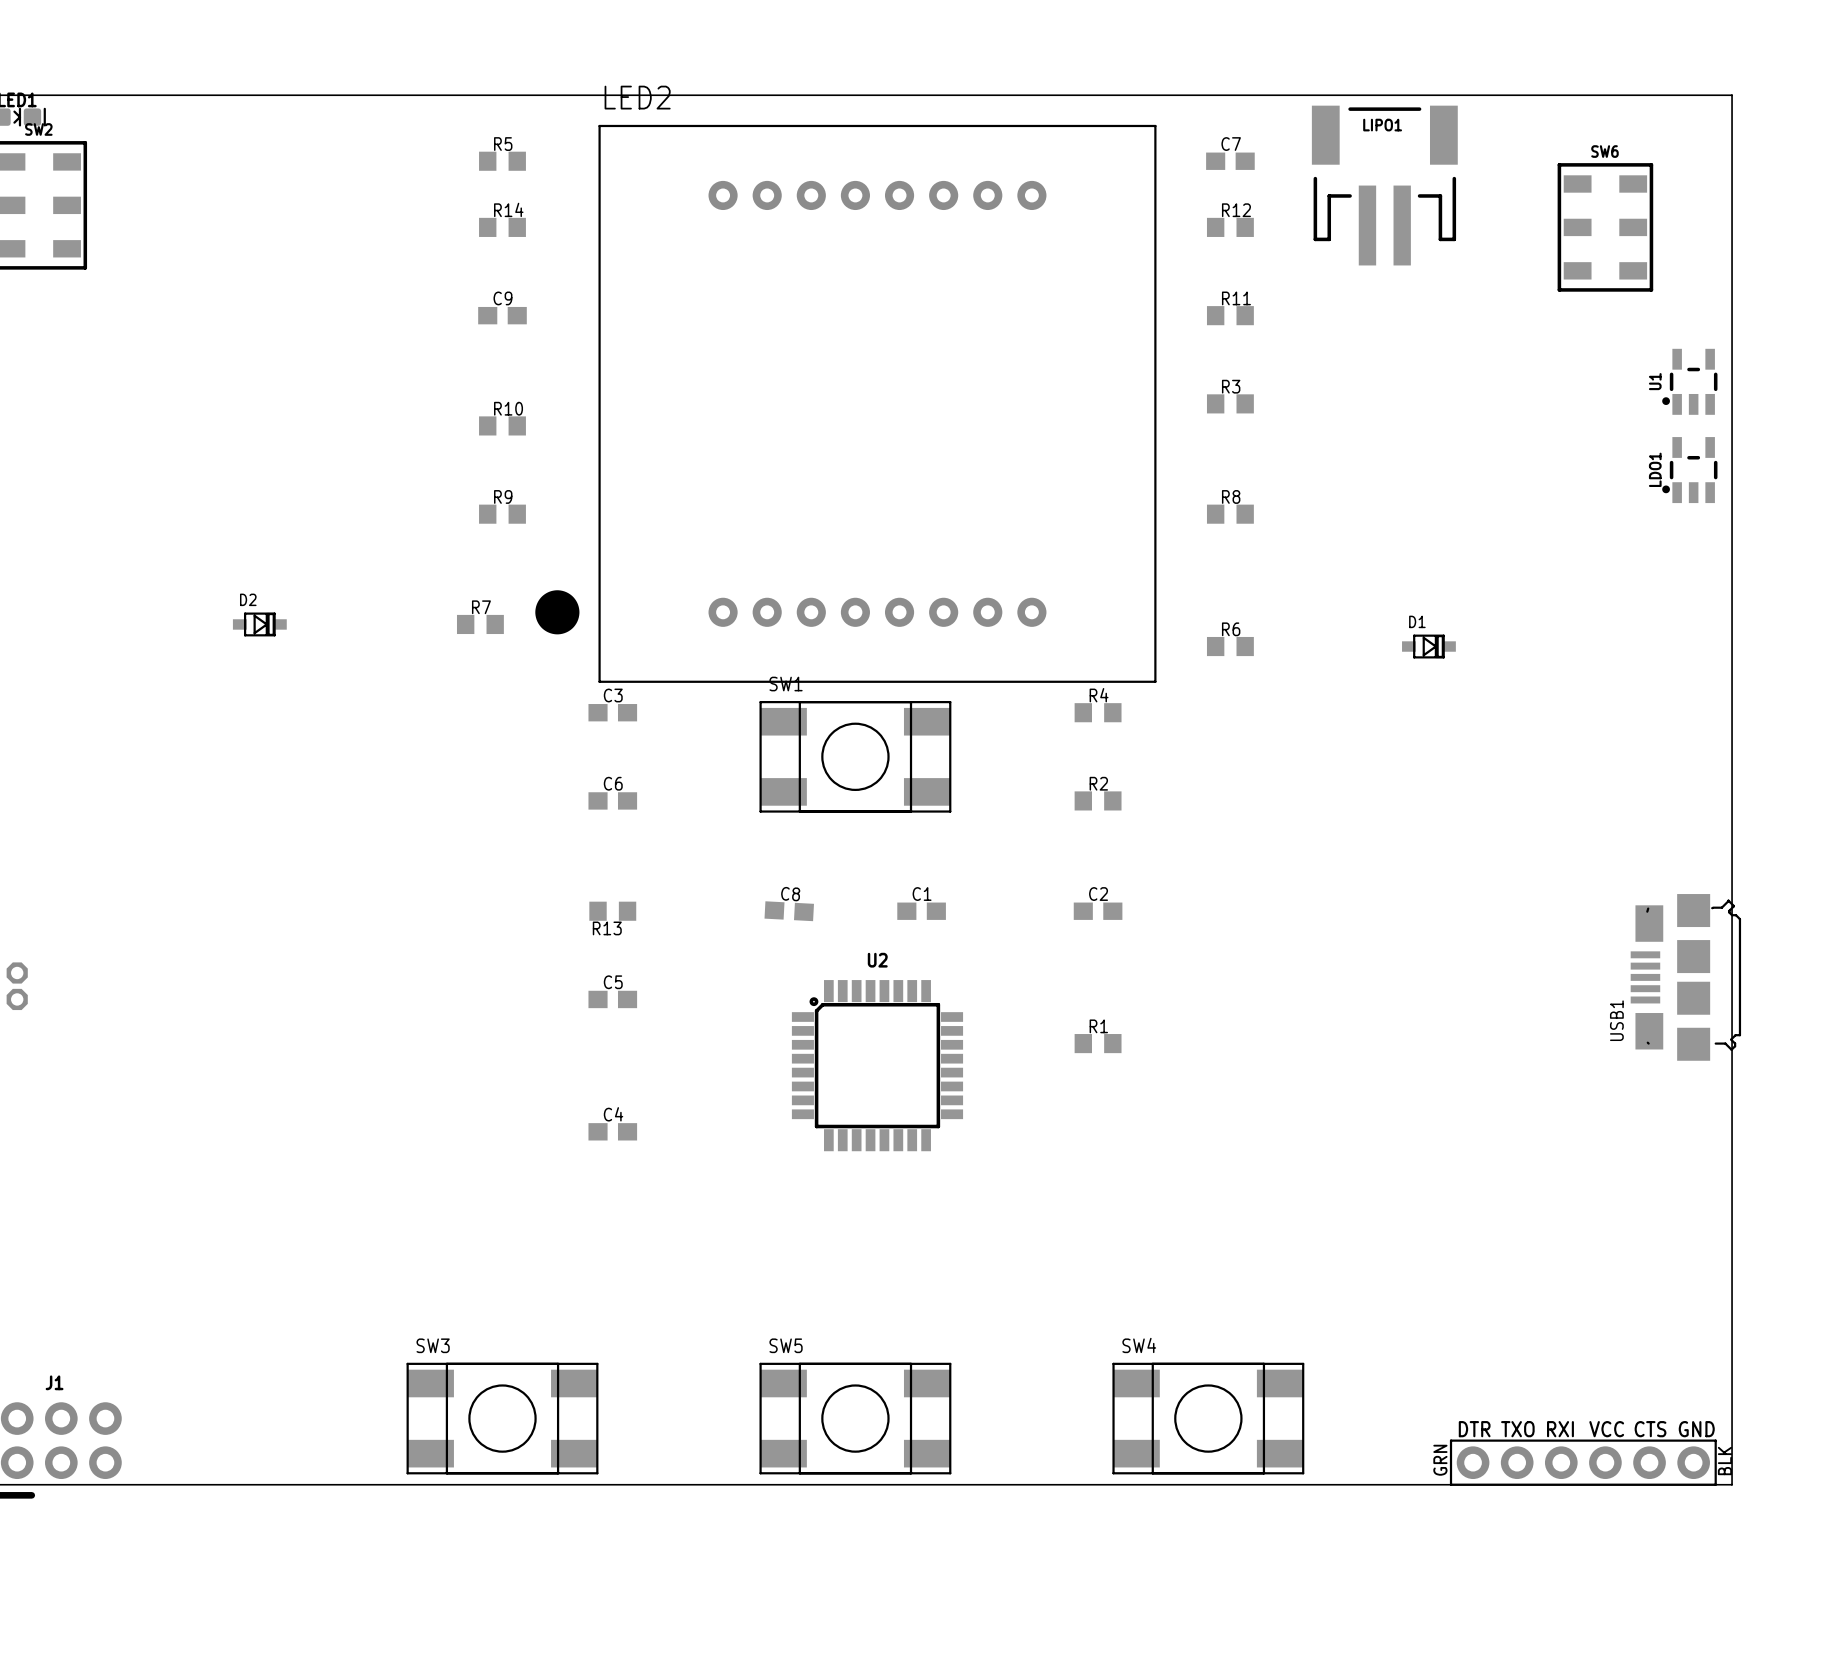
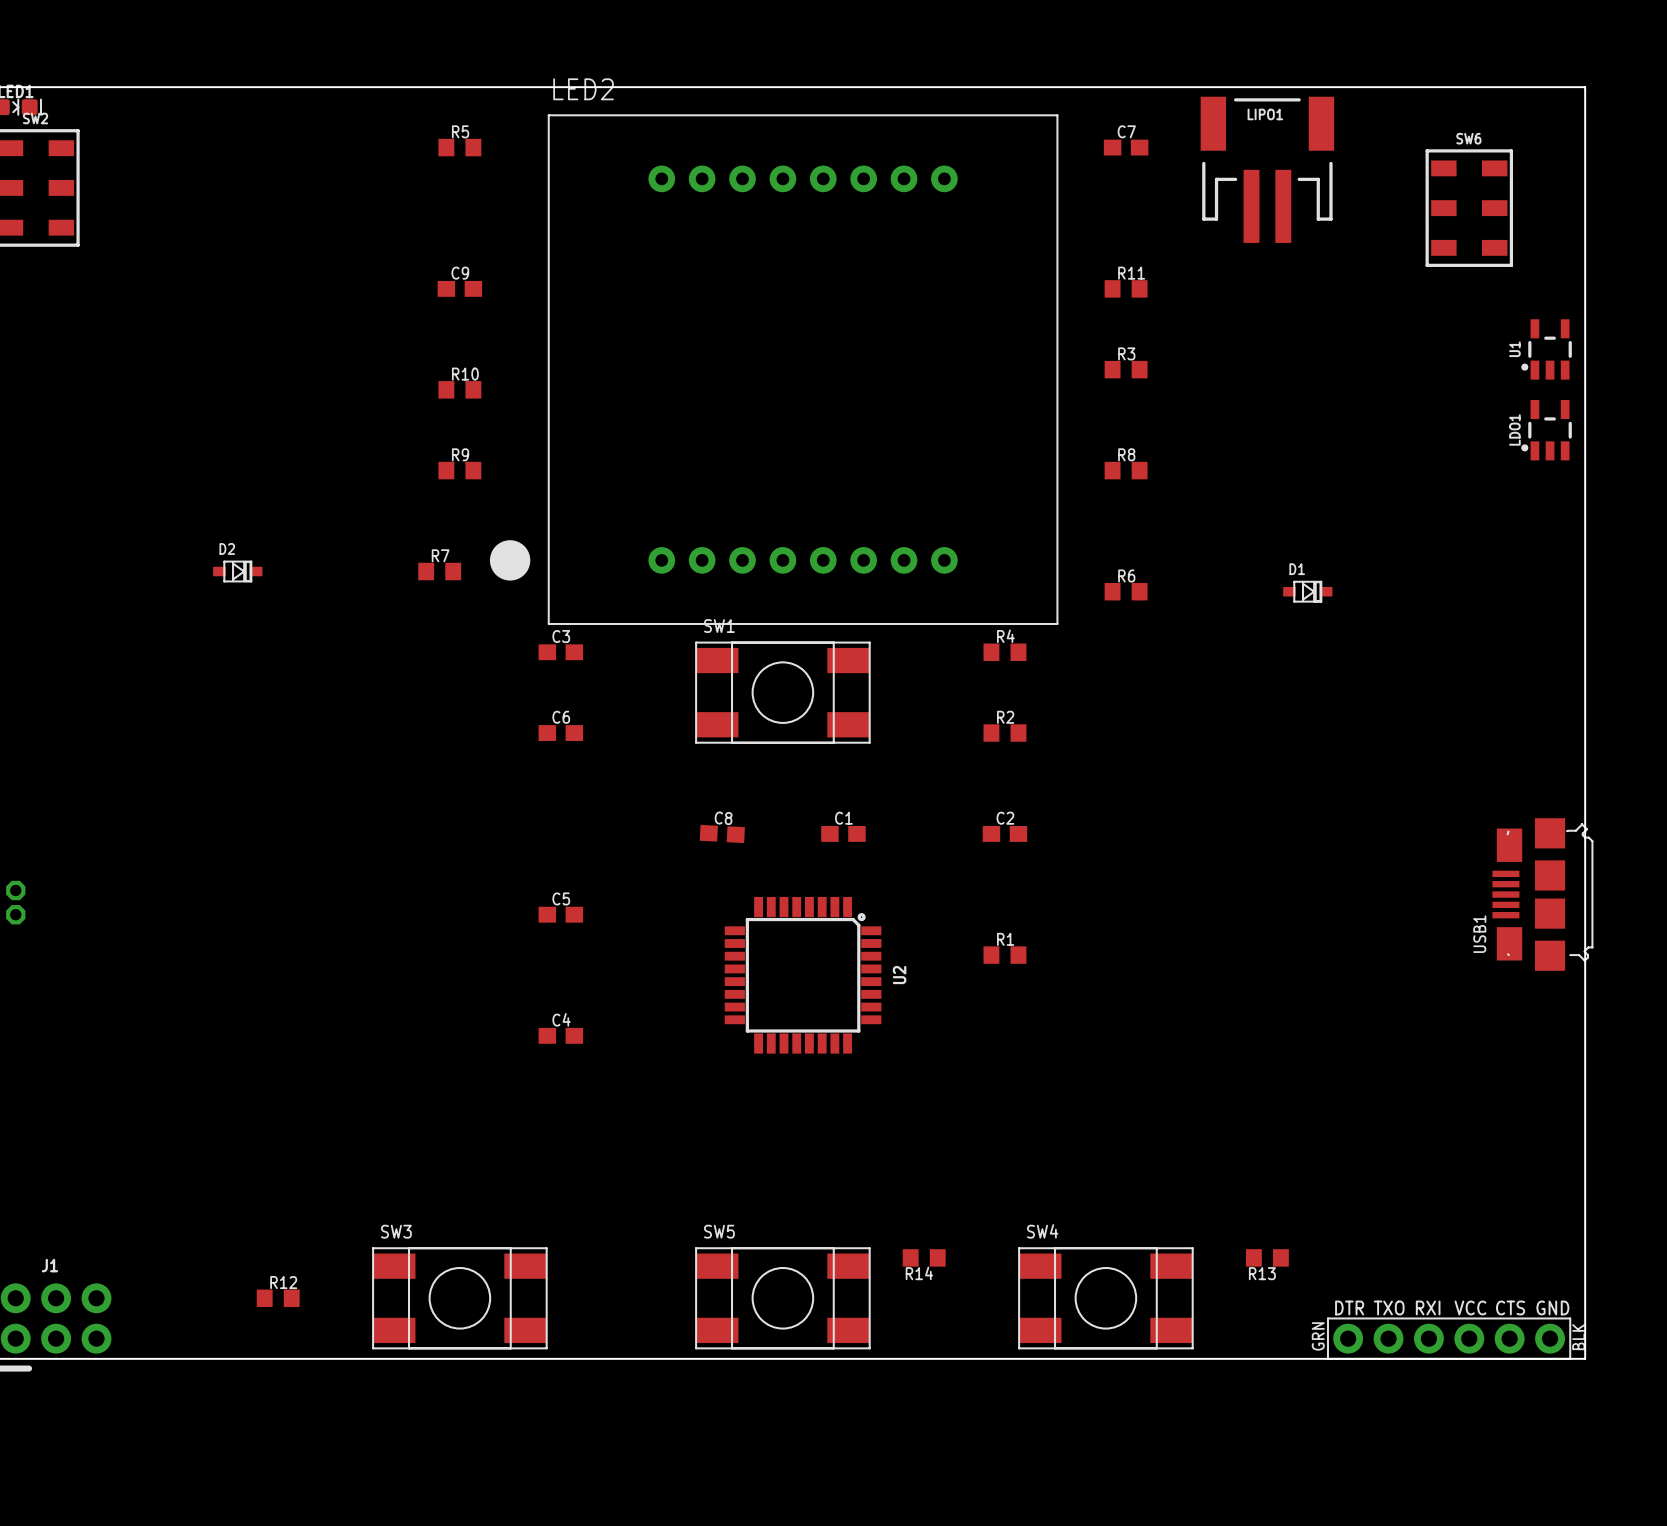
R14 name position: R14 (508, 209) -> R14 (919, 1273)
R14 position: (502, 227) -> (924, 1257)
R12 position: (1230, 227) -> (278, 1298)
R13 position: (612, 911) -> (1267, 1257)
U2 rotation: 0° (877, 1065) -> 90° clockwise (803, 975)

